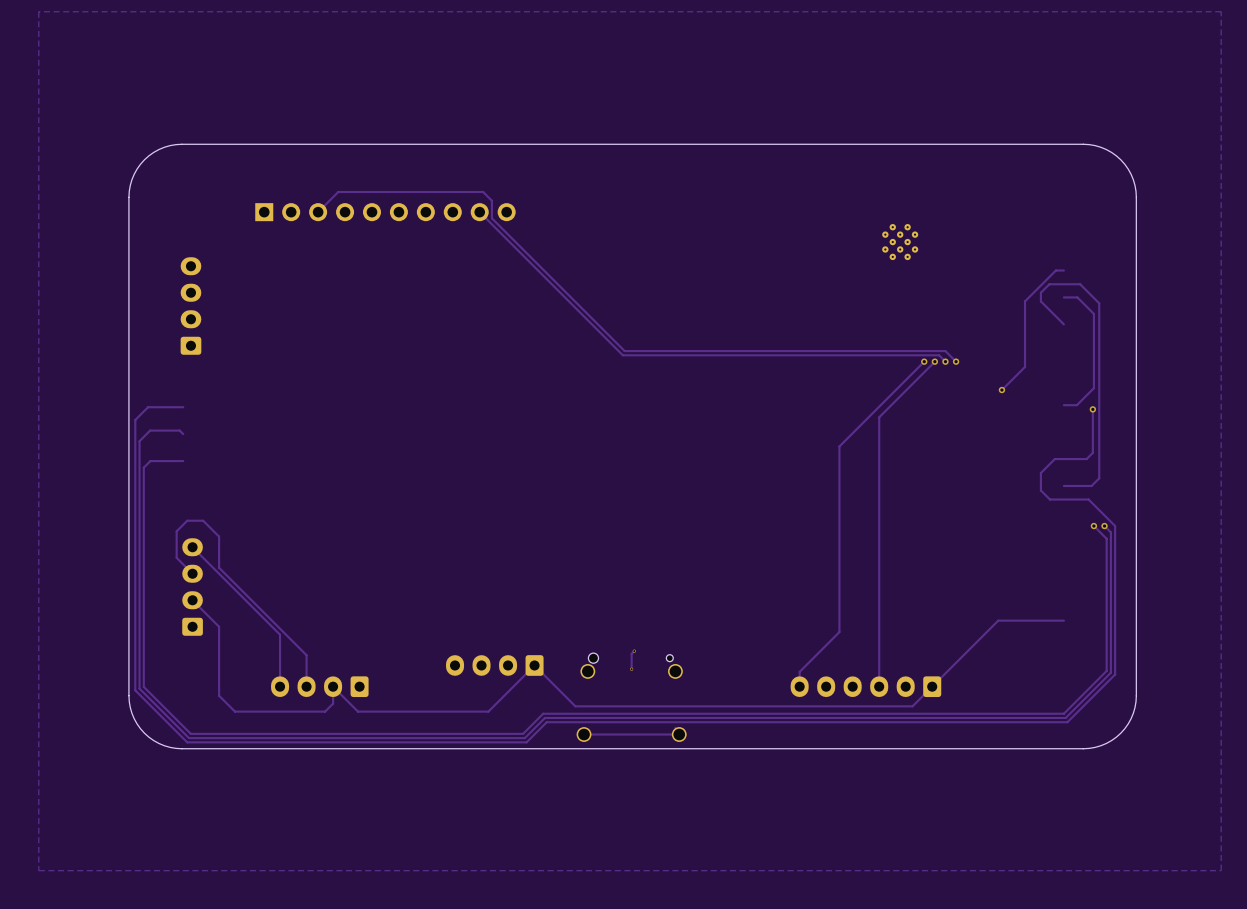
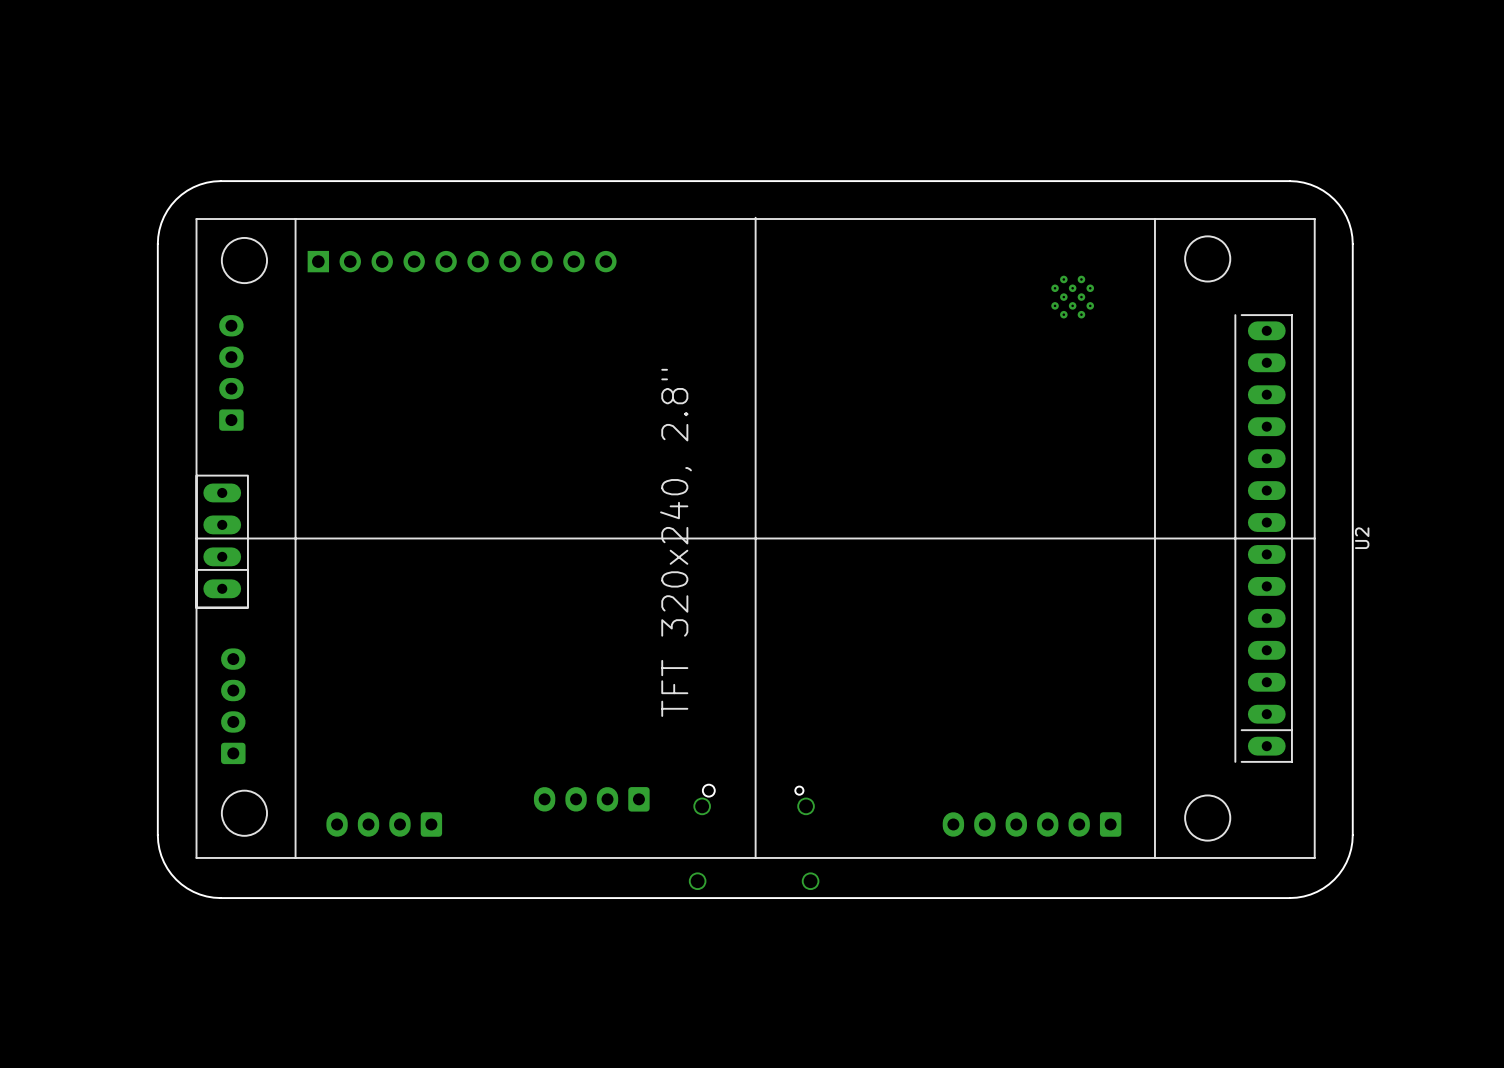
zone outline: (38, 11) (38, 870) (1221, 870) (1221, 11) (38, 11) -> none
track: (318, 212) (338, 192) (483, 192) (491, 200) (491, 218) (624, 351) (945, 351) (956, 361) -> none
track: (479, 212) (622, 355) (939, 355) (945, 361) -> none
track: (1063, 270) (1055, 270) (1025, 301) (1025, 366) (1001, 390) -> none
track: (1063, 297) (1077, 297) (1093, 313) (1093, 388) (1076, 405) (1063, 405) -> none
track: (1063, 324) (1040, 301) (1040, 292) (1049, 284) (1080, 284) (1099, 303) (1099, 478) (1091, 485) (1063, 485) -> none
track: (924, 361) (839, 446) (839, 632) (799, 671) (799, 686) -> none
via: (924, 361) -> none
track: (934, 361) (879, 417) (879, 686) -> none
via: (934, 361) -> none
via: (945, 361) -> none
via: (956, 361) -> none
via: (1001, 390) -> none
track: (183, 407) (148, 407) (135, 419) (135, 690) (187, 742) (526, 742) (546, 722) (1067, 722) (1115, 674) (1115, 526) (1088, 499) (1049, 499) (1040, 490) (1040, 473) (1054, 459) (1086, 459) (1092, 452) (1092, 409) -> none
via: (1092, 409) -> none
track: (183, 434) (179, 430) (150, 430) (139, 441) (139, 688) (189, 738) (524, 738) (544, 717) (1065, 717) (1110, 672) (1110, 532) (1104, 526) -> none
U2: none -> (755, 537)
track: (183, 461) (150, 461) (143, 467) (143, 686) (190, 733) (523, 733) (543, 713) (1063, 713) (1106, 670) (1106, 538) (1093, 526) -> none
via: (1093, 526) -> none
via: (1104, 526) -> none
track: (192, 547) (280, 634) (280, 686) -> none
track: (192, 573) (176, 557) (176, 531) (187, 520) (203, 520) (219, 536) (219, 567) (306, 655) (306, 686) -> none
track: (192, 600) (219, 626) (219, 695) (234, 711) (325, 711) (333, 703) (333, 686) (357, 711) (488, 711) (534, 665) (575, 706) (912, 706) (998, 620) (1063, 620) -> none
track: (634, 651) (631, 653) (631, 669) -> none
via: (634, 651) -> none
via: (631, 669) -> none
track: (675, 727) (679, 734) (584, 734) (587, 730) -> none

